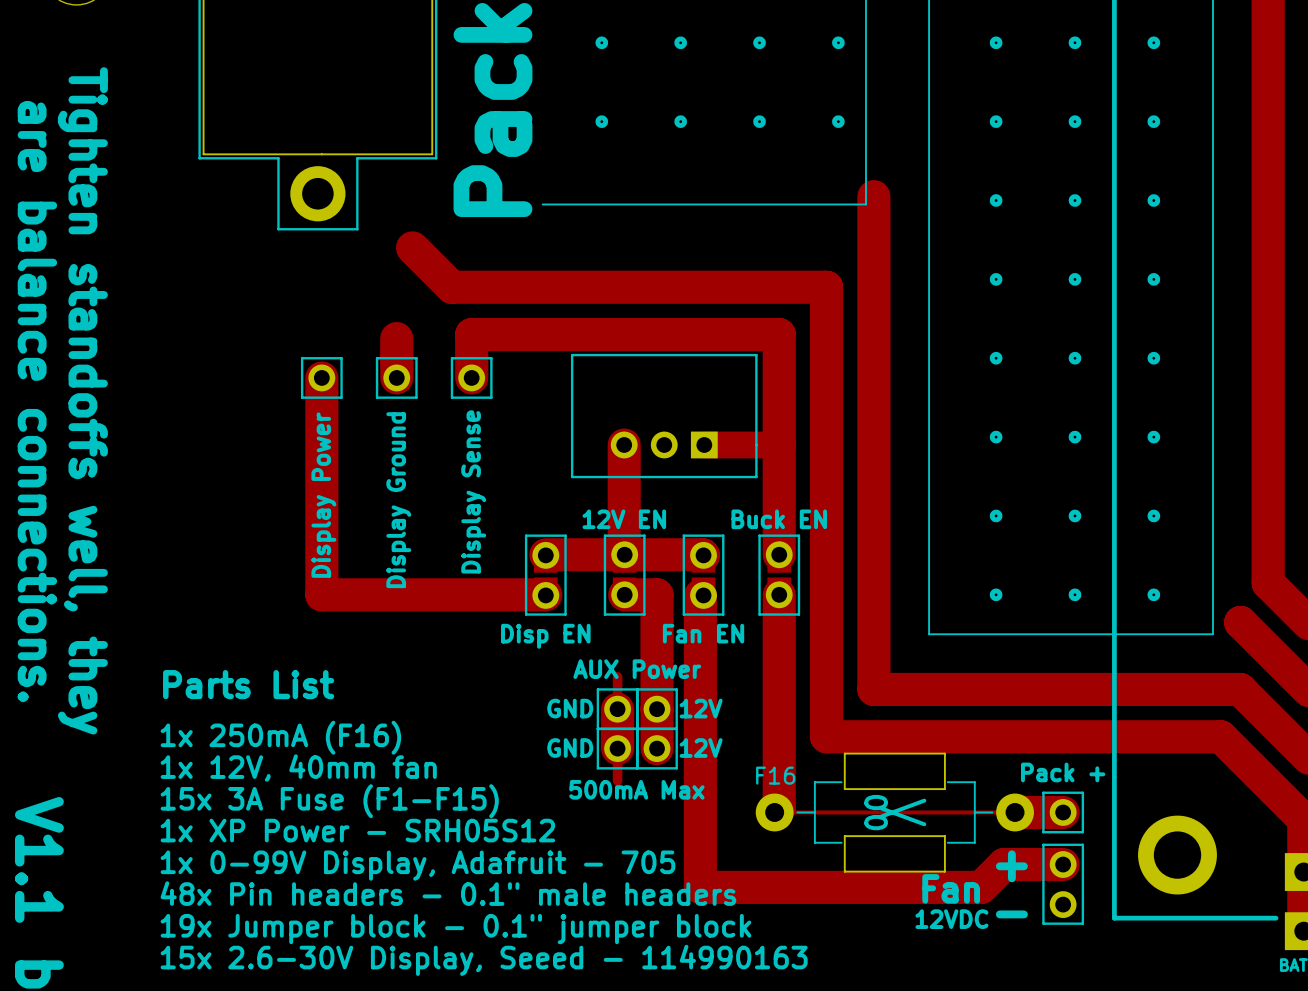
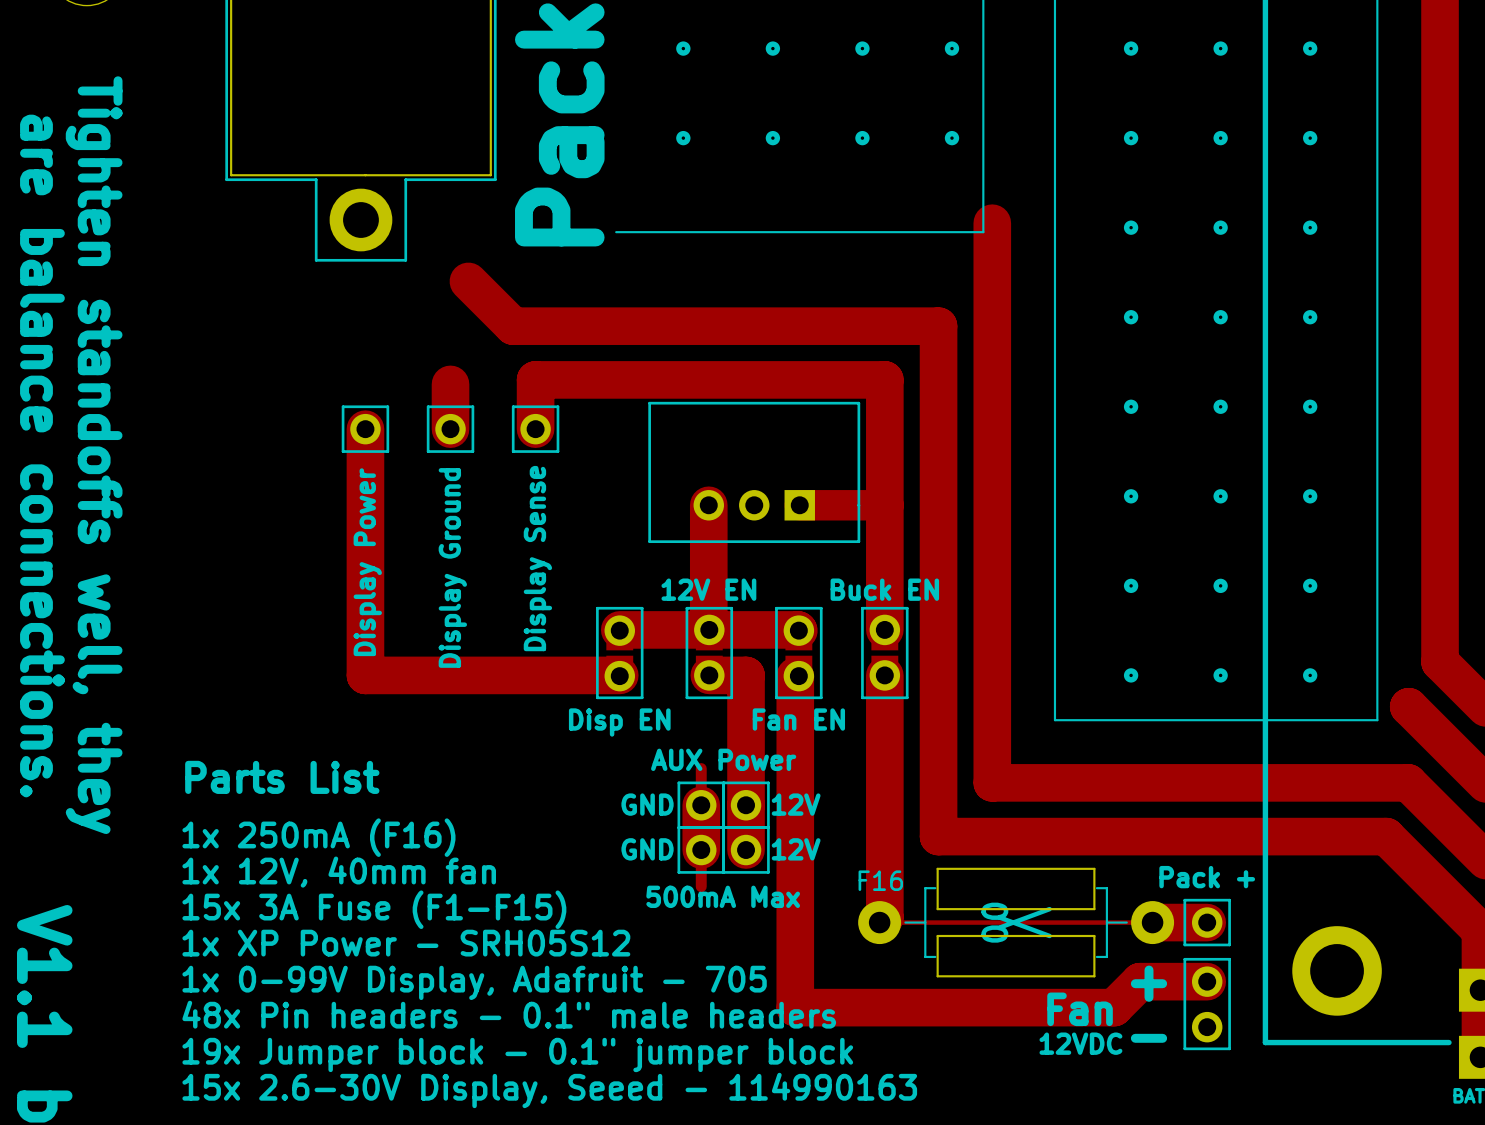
part footprint: [755, 752, 1034, 873] -> [858, 867, 1175, 978]

